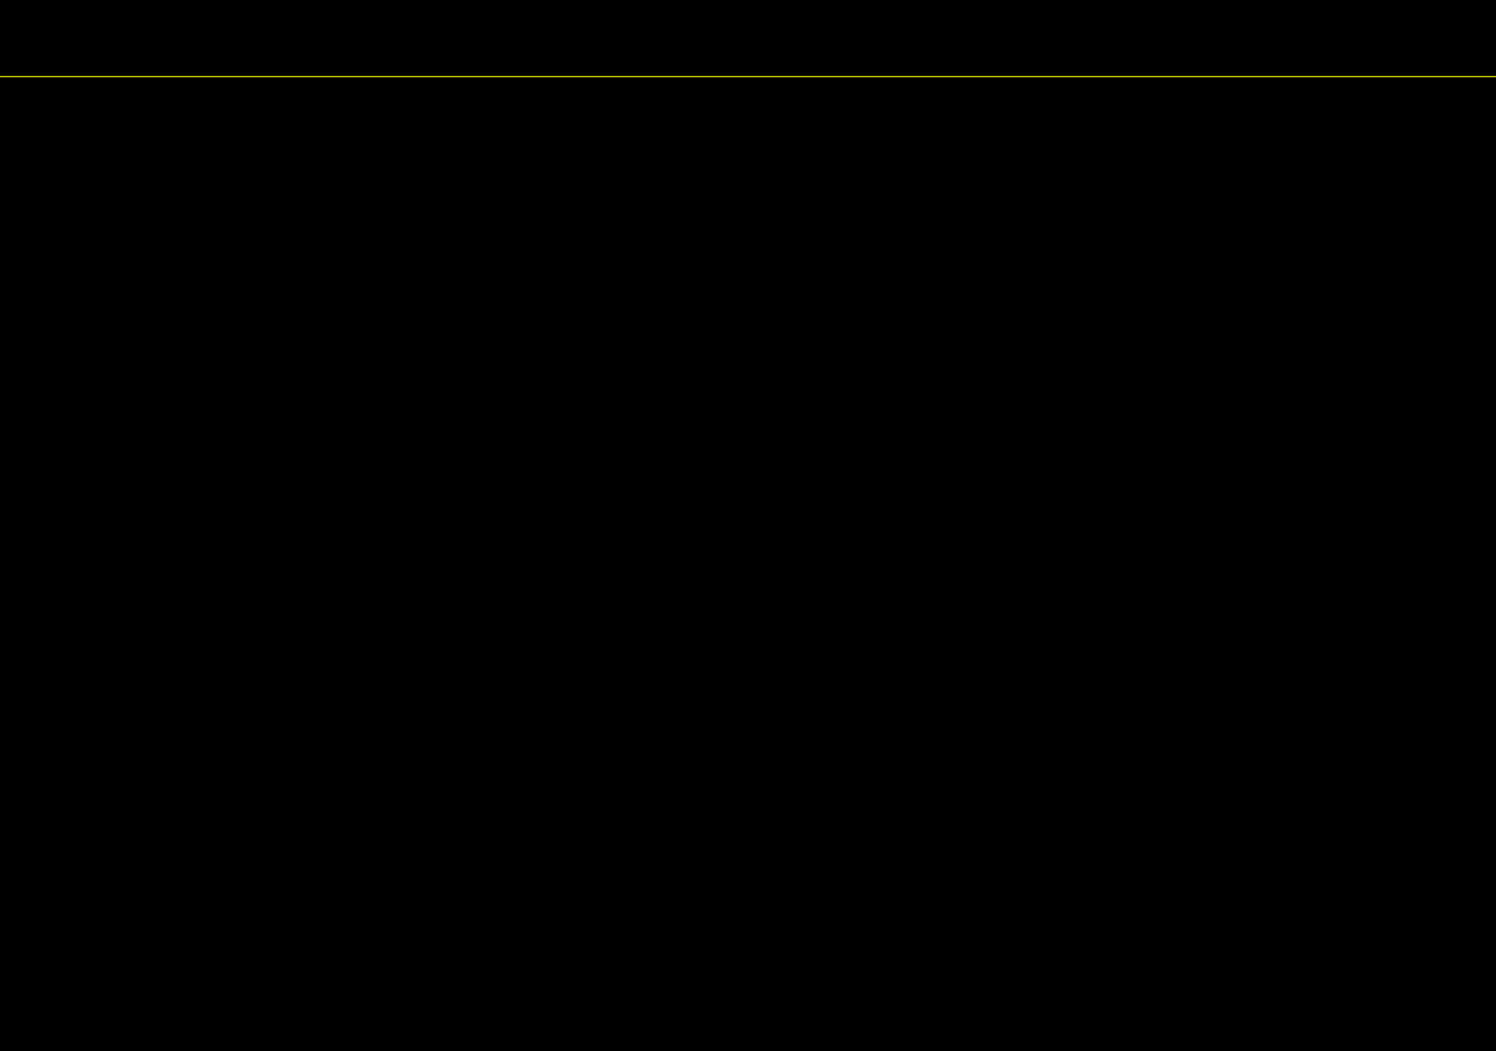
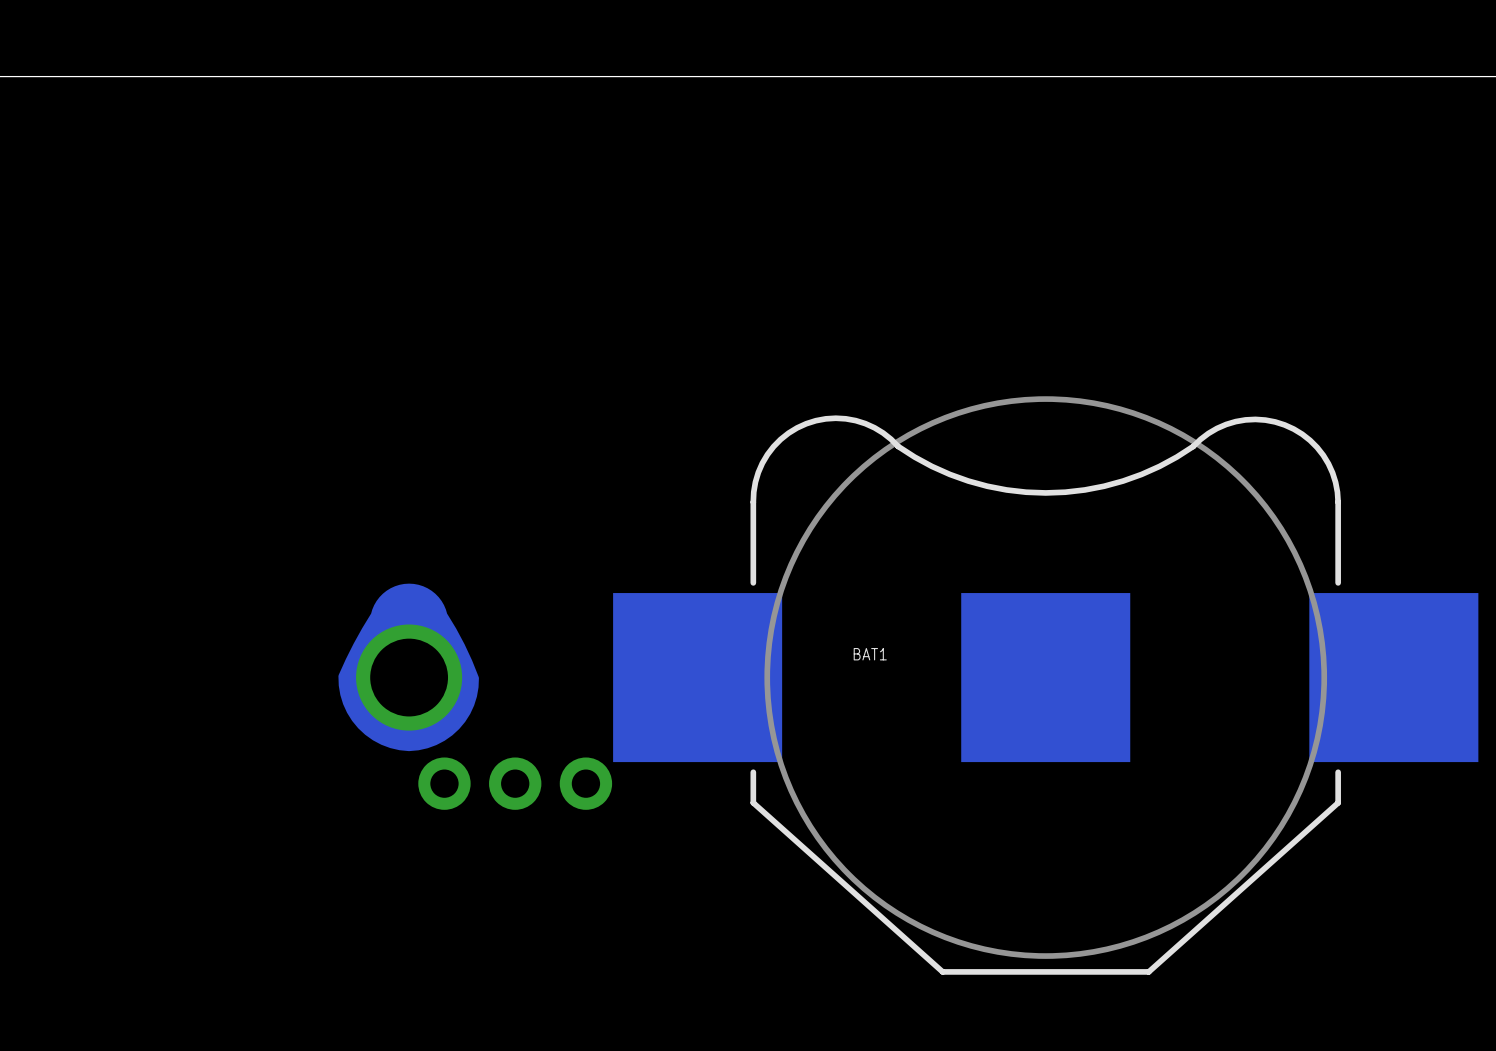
part: none -> (408, 667)
BAT1: none -> (1045, 685)
part: none -> (515, 783)

